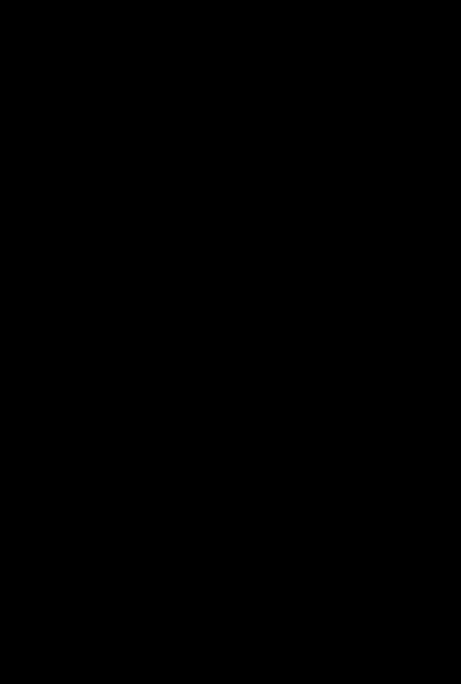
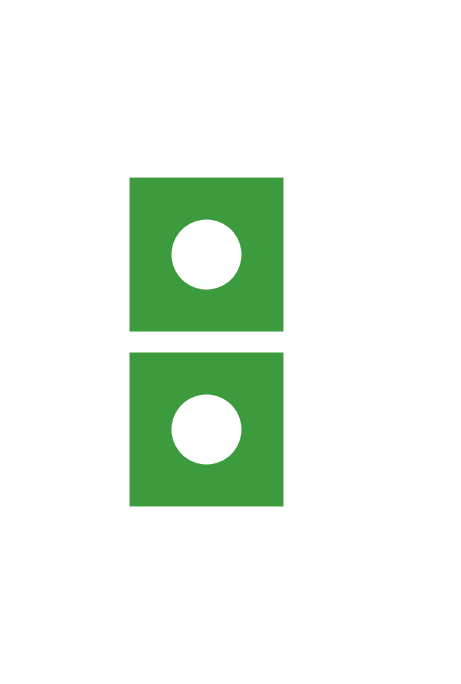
part: none -> (206, 254)
part: none -> (206, 429)

